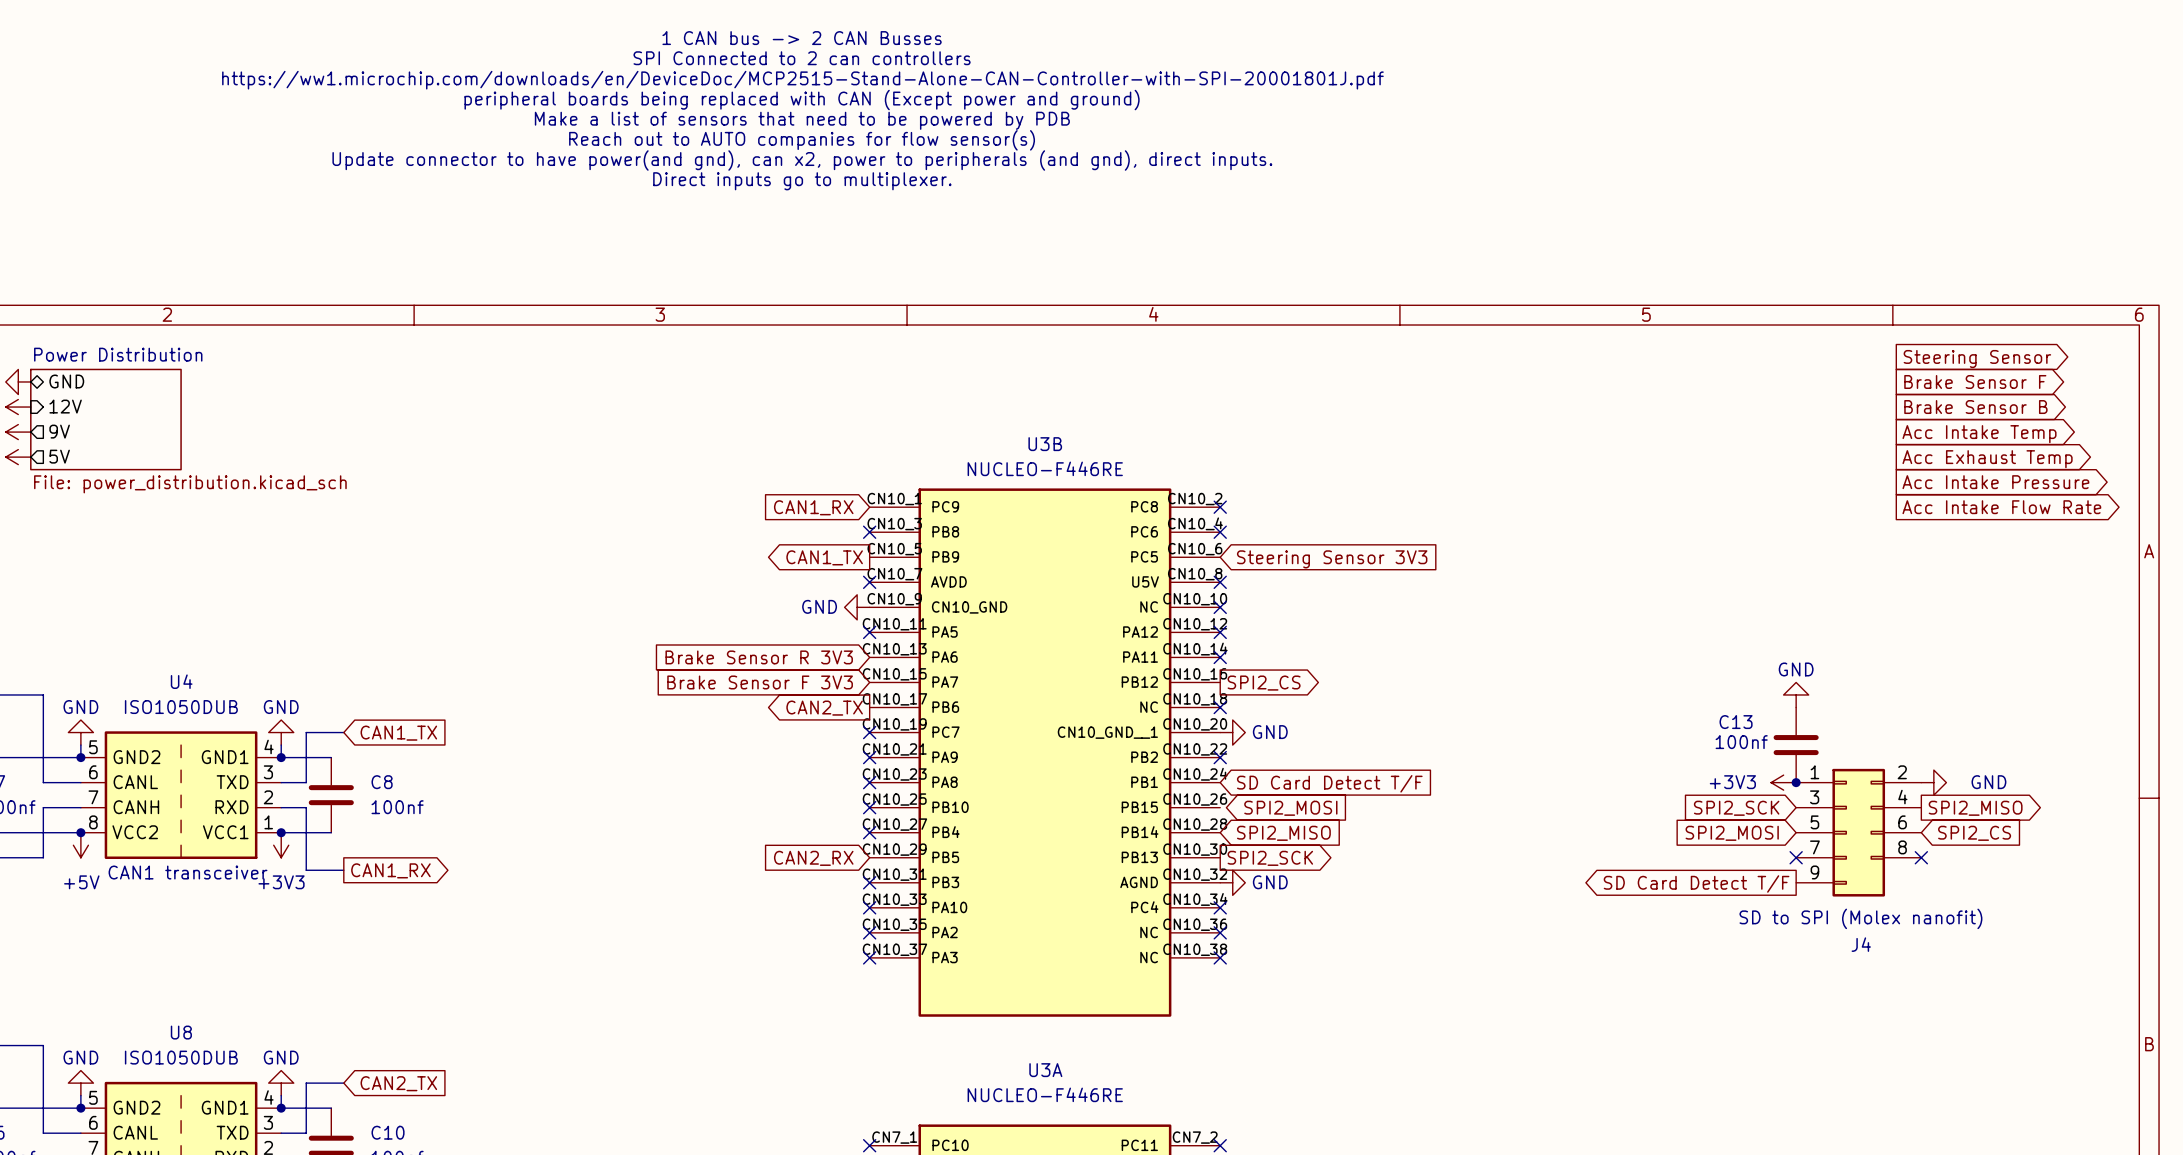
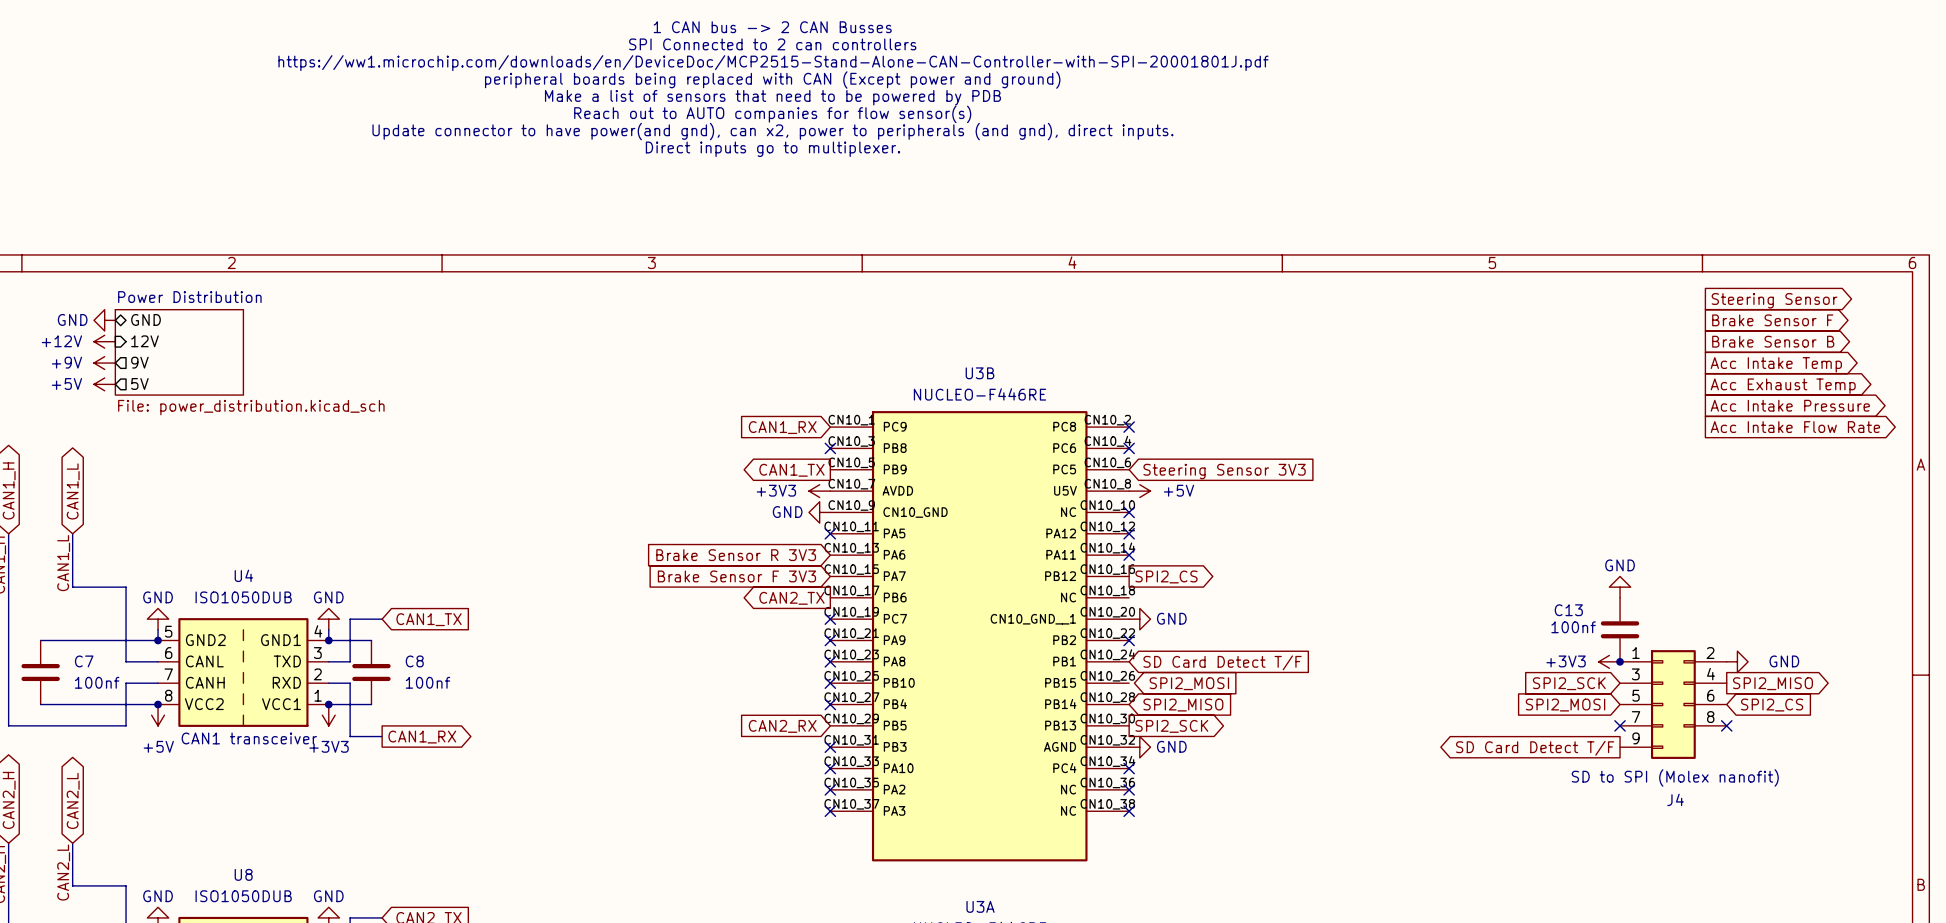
power symbol: none -> +3V3 (819, 491)
no-connect mark: (869, 582) -> none
no-connect mark: (1220, 582) -> none
power symbol: none -> +5V (1139, 491)
no-connect mark: (1220, 707) -> none

